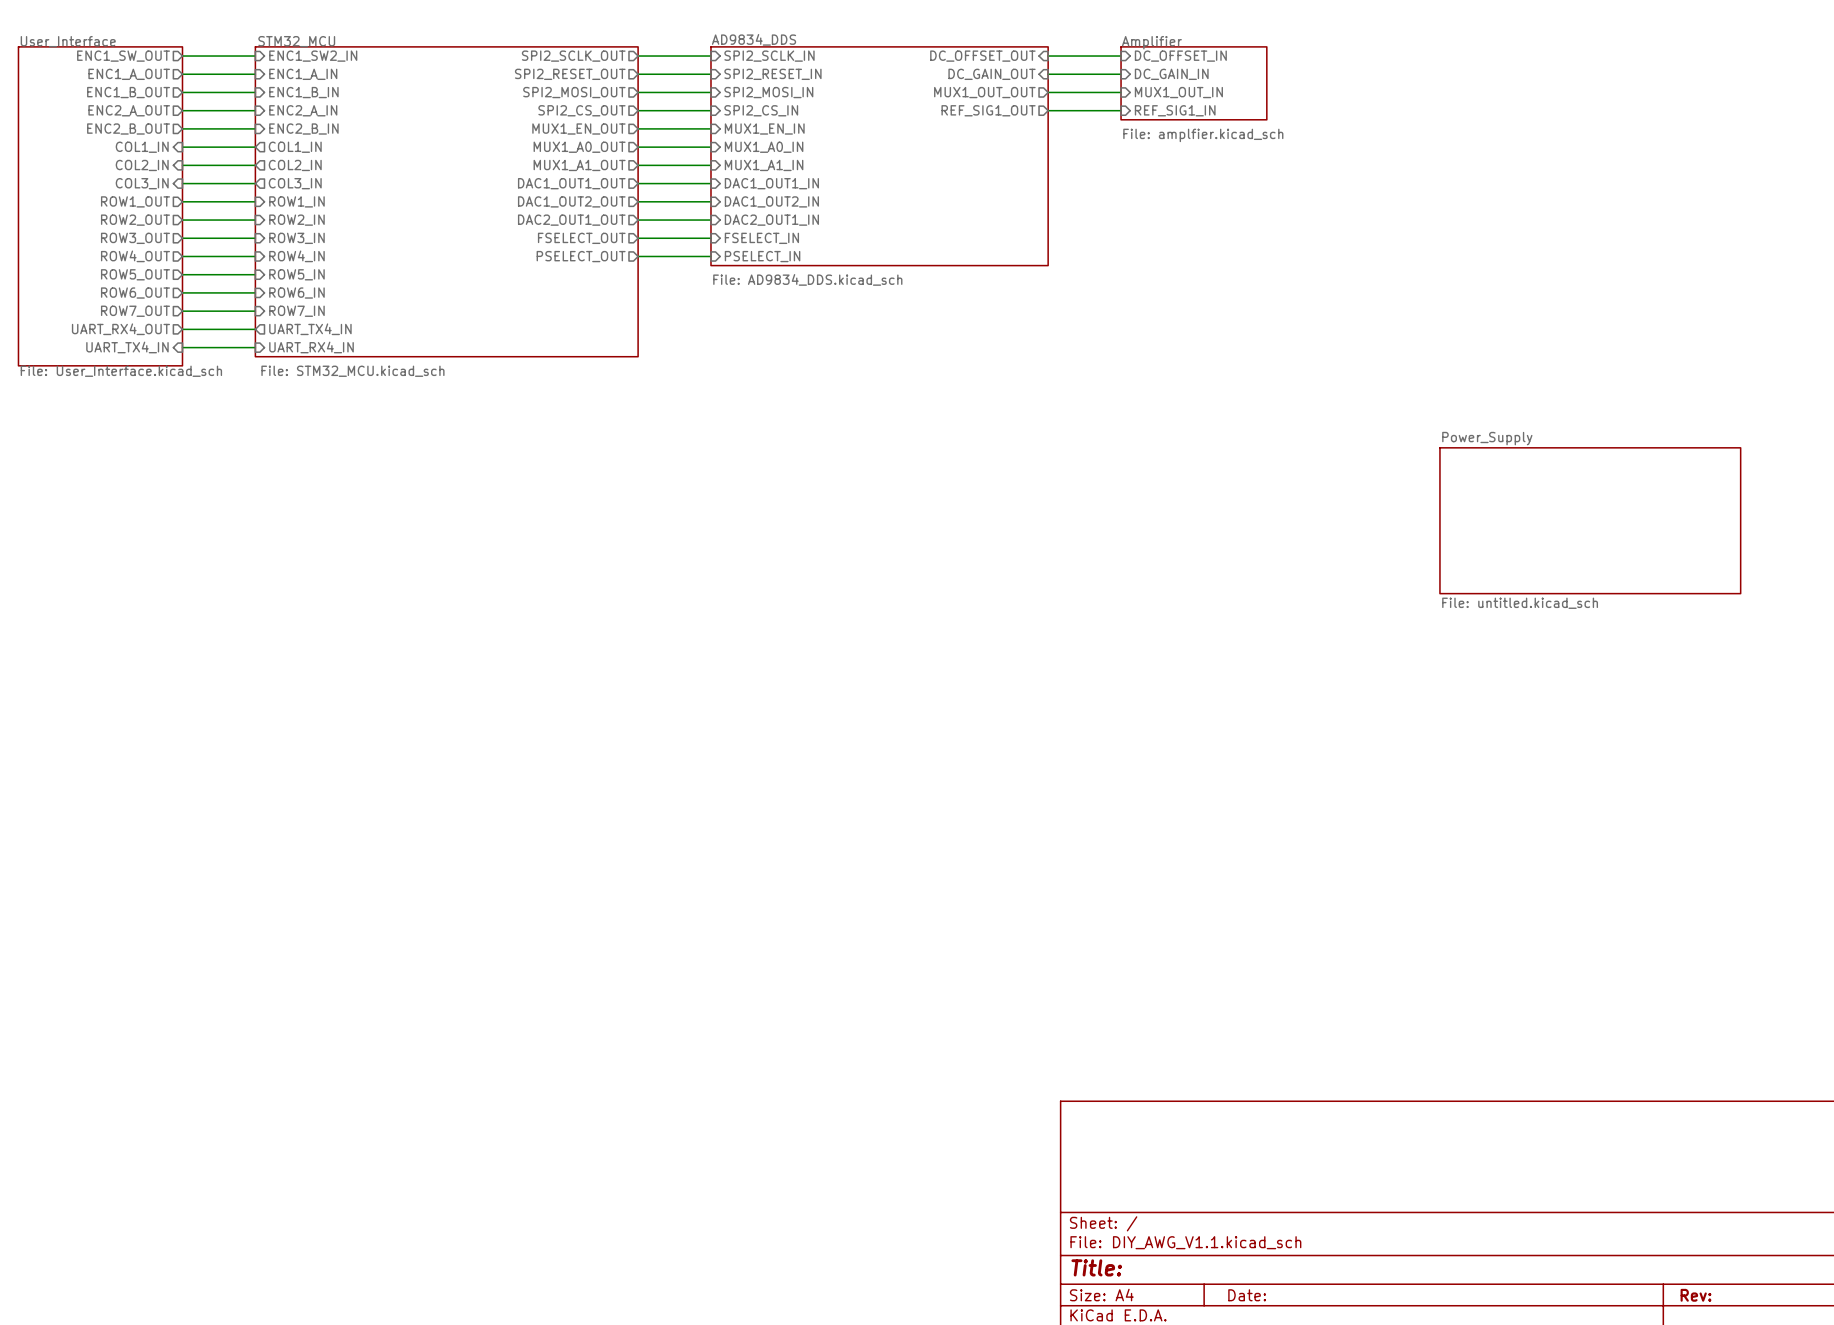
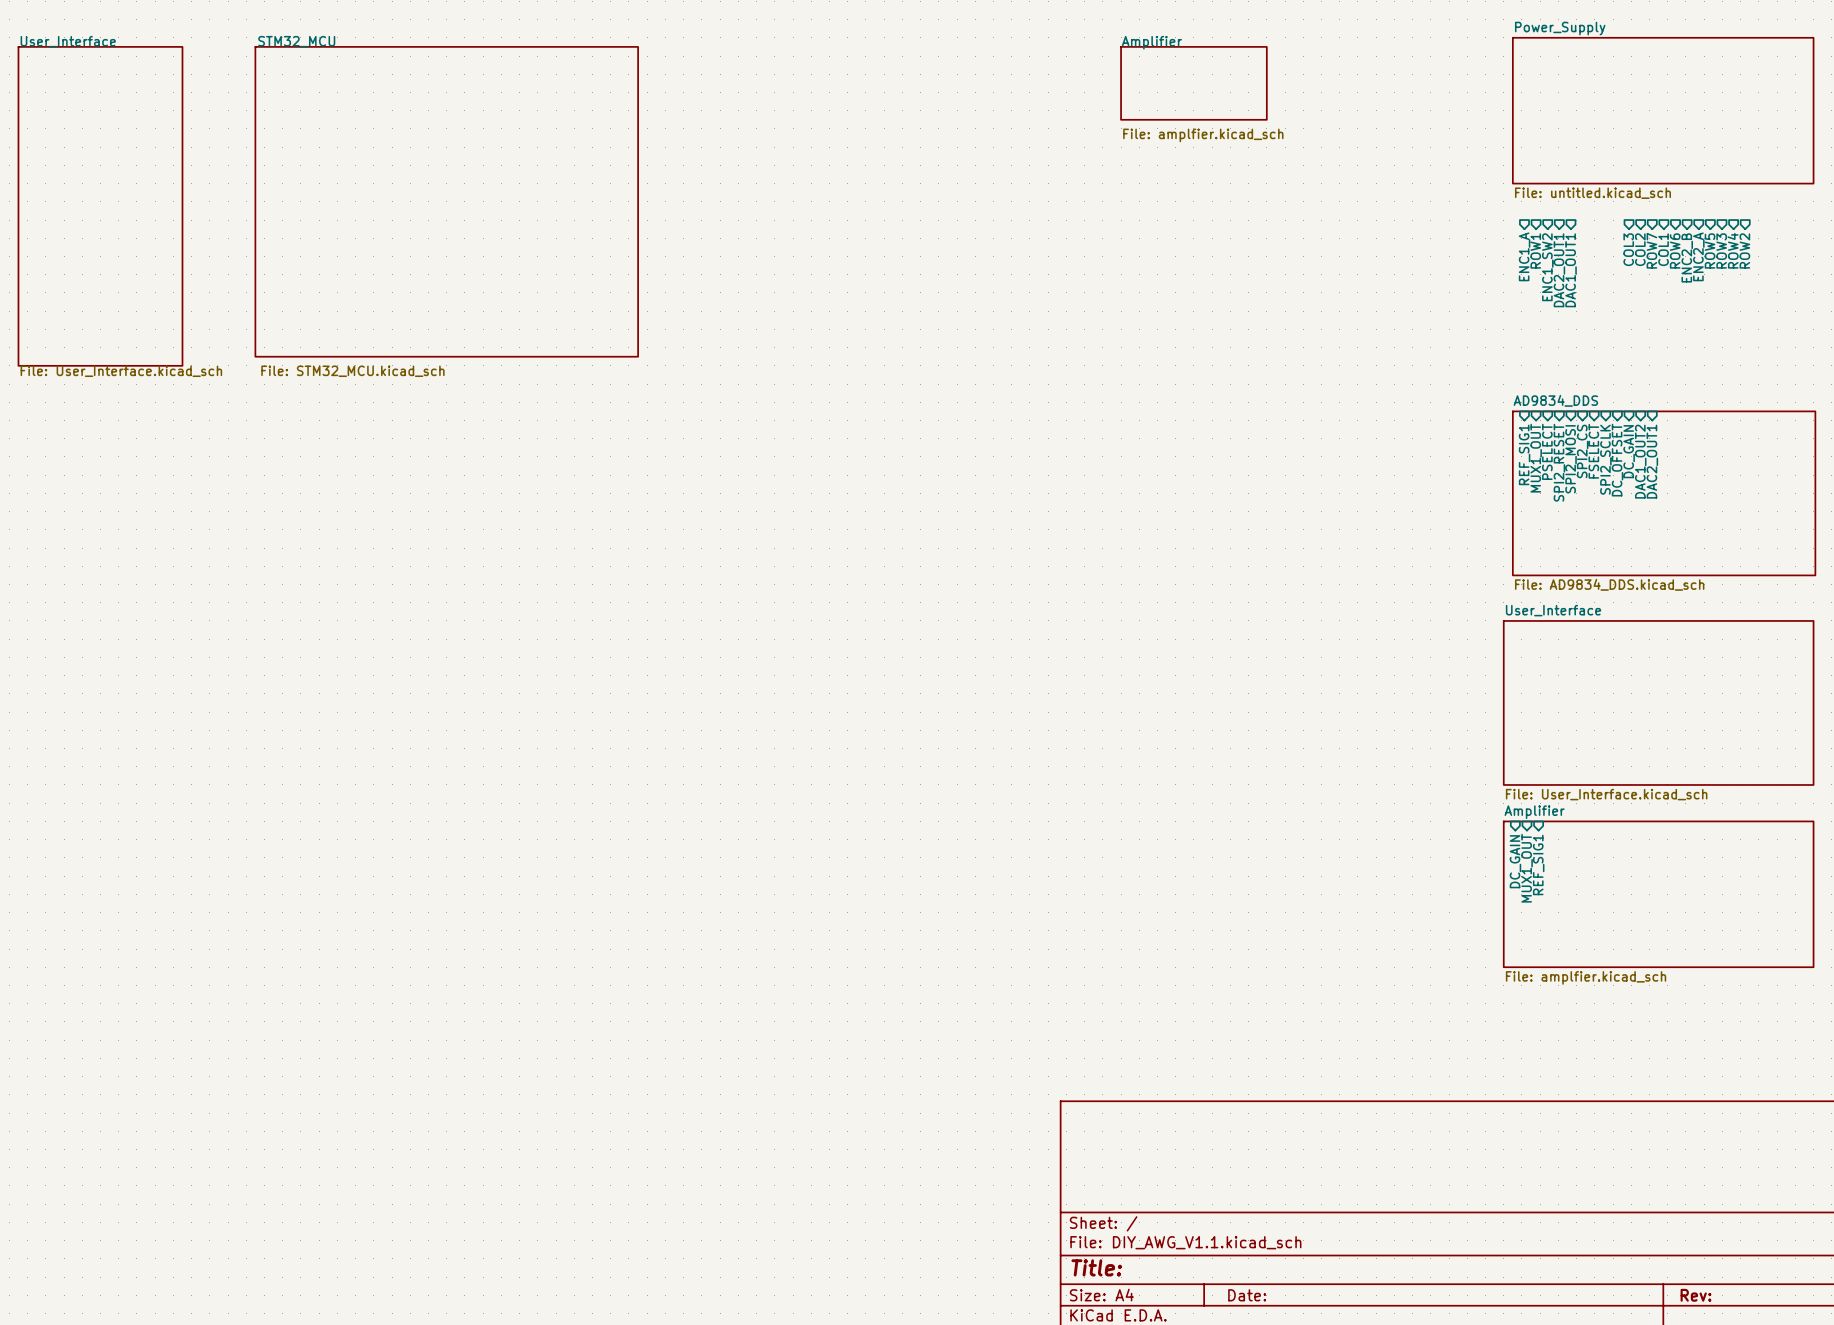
sheet AD9834_DDS name position: AD9834_DDS (754, 39) -> AD9834_DDS (1555, 400)
sheet AD9834_DDS shape: [710, 46, 1049, 267] -> [1512, 410, 1816, 576]
sheet pin: ENC1_SW_OUT (123, 56) -> none
wire: (182, 56) (255, 56) -> none
sheet pin: ENC1_SW2_IN (313, 56) -> none
sheet pin: SPI2_SCLK_OUT (573, 56) -> none
wire: (638, 56) (710, 56) -> none
sheet pin: SPI2_SCLK_IN (769, 56) -> none
sheet pin: DC_OFFSET_OUT (982, 56) -> none
wire: (1048, 56) (1121, 56) -> none
sheet pin: DC_OFFSET_IN (1180, 56) -> none
sheet pin: ENC1_A_OUT (129, 74) -> none
wire: (182, 74) (255, 74) -> none
sheet pin: ENC1_A_IN (303, 74) -> none
sheet pin: SPI2_RESET_OUT (570, 74) -> none
wire: (638, 74) (710, 74) -> none
sheet pin: SPI2_RESET_IN (772, 74) -> none
sheet pin: DC_GAIN_OUT (992, 74) -> none
wire: (1048, 74) (1121, 74) -> none
sheet pin: DC_GAIN_IN (1171, 74) -> none
sheet pin: ENC1_B_OUT (128, 92) -> none
wire: (182, 92) (255, 92) -> none
sheet pin: ENC1_B_IN (303, 92) -> none
sheet pin: SPI2_MOSI_OUT (574, 92) -> none
wire: (638, 92) (710, 92) -> none
sheet pin: SPI2_MOSI_IN (768, 92) -> none
sheet pin: MUX1_OUT_OUT (984, 92) -> none
wire: (1048, 92) (1121, 92) -> none
sheet pin: MUX1_OUT_IN (1178, 92) -> none
sheet pin: ENC2_A_OUT (129, 110) -> none
wire: (182, 110) (255, 110) -> none
sheet pin: ENC2_A_IN (303, 110) -> none
sheet pin: SPI2_CS_OUT (581, 110) -> none
wire: (638, 110) (710, 110) -> none
sheet pin: SPI2_CS_IN (761, 110) -> none
sheet pin: REF_SIG1_OUT (988, 110) -> none
wire: (1048, 110) (1121, 110) -> none
sheet pin: REF_SIG1_IN (1175, 110) -> none
sheet Power_Supply: none -> File: untitled.kicad_sch (1663, 110)
wire: (182, 128) (255, 128) -> none
wire: (638, 128) (710, 128) -> none
sheet pin: ENC2_B_OUT (128, 129) -> none
sheet pin: ENC2_B_IN (303, 129) -> none
sheet pin: MUX1_EN_OUT (578, 129) -> none
sheet pin: MUX1_EN_IN (764, 129) -> none
sheet pin: COL1_IN (142, 147) -> none
wire: (182, 147) (255, 147) -> none
sheet pin: COL1_IN (295, 147) -> none
sheet pin: MUX1_A0_OUT (579, 147) -> none
wire: (638, 147) (710, 147) -> none
sheet pin: MUX1_A0_IN (764, 147) -> none
sheet pin: COL2_IN (142, 165) -> none
wire: (182, 165) (255, 165) -> none
sheet pin: COL2_IN (295, 165) -> none
sheet pin: MUX1_A1_OUT (579, 165) -> none
wire: (638, 165) (710, 165) -> none
sheet pin: MUX1_A1_IN (764, 165) -> none
sheet pin: COL3_IN (142, 183) -> none
wire: (182, 183) (255, 183) -> none
sheet pin: COL3_IN (295, 183) -> none
sheet pin: DAC1_OUT1_OUT (571, 183) -> none
wire: (638, 183) (710, 183) -> none
sheet pin: DAC1_OUT1_IN (771, 183) -> none
sheet pin: ROW1_OUT (135, 201) -> none
wire: (182, 201) (255, 201) -> none
sheet pin: ROW1_IN (296, 201) -> none
sheet pin: DAC1_OUT2_OUT (571, 201) -> none
wire: (638, 201) (710, 201) -> none
sheet pin: DAC1_OUT2_IN (771, 201) -> none
sheet pin: ROW2_OUT (135, 220) -> none
wire: (182, 220) (255, 220) -> none
sheet pin: ROW2_IN (296, 220) -> none
sheet pin: DAC2_OUT1_OUT (571, 220) -> none
wire: (638, 220) (710, 220) -> none
sheet pin: DAC2_OUT1_IN (771, 220) -> none
sheet pin: ROW3_OUT (135, 238) -> none
wire: (182, 238) (255, 238) -> none
sheet pin: ROW3_IN (296, 238) -> none
sheet pin: FSELECT_OUT (581, 238) -> none
wire: (638, 238) (710, 238) -> none
sheet pin: FSELECT_IN (761, 238) -> none
sheet pin: none -> COL3 (1628, 249)
sheet pin: none -> COL2 (1640, 249)
sheet pin: none -> COL1 (1663, 249)
sheet pin: none -> ROW1 (1535, 250)
sheet pin: none -> ROW7 (1651, 250)
sheet pin: none -> ROW6 (1675, 250)
sheet pin: none -> ROW5 (1710, 250)
sheet pin: none -> ROW3 (1721, 250)
sheet pin: none -> ROW4 (1733, 250)
sheet pin: none -> ROW2 (1744, 250)
sheet pin: ROW4_OUT (135, 256) -> none
wire: (182, 256) (255, 256) -> none
sheet pin: ROW4_IN (296, 256) -> none
sheet pin: PSELECT_OUT (581, 256) -> none
wire: (638, 256) (710, 256) -> none
sheet pin: PSELECT_IN (762, 256) -> none
sheet pin: none -> ENC1_A (1524, 256)
sheet pin: none -> ENC2_A (1698, 256)
sheet pin: none -> ENC2_B (1687, 257)
sheet pin: none -> ENC1_SW2 (1547, 267)
sheet pin: none -> DAC2_OUT1 (1559, 270)
sheet pin: none -> DAC1_OUT1 (1571, 270)
sheet pin: ROW5_OUT (135, 274) -> none
wire: (182, 274) (255, 274) -> none
sheet pin: ROW5_IN (296, 274) -> none
sheet AD9834_DDS value position: File: AD9834_DDS.kicad_sch (807, 279) -> File: AD9834_DDS.kicad_sch (1609, 584)
wire: (182, 292) (255, 292) -> none
sheet pin: ROW6_OUT (135, 293) -> none
sheet pin: ROW6_IN (296, 293) -> none
sheet pin: ROW7_OUT (135, 311) -> none
wire: (182, 311) (255, 311) -> none
sheet pin: ROW7_IN (296, 311) -> none
sheet pin: UART_RX4_OUT (120, 329) -> none
wire: (182, 329) (255, 329) -> none
sheet pin: UART_TX4_IN (310, 329) -> none
sheet pin: UART_TX4_IN (127, 347) -> none
wire: (182, 347) (255, 347) -> none
sheet pin: UART_RX4_IN (311, 347) -> none
sheet pin: none -> PSELECT (1547, 451)
sheet pin: none -> SPI2_CS (1582, 451)
sheet pin: none -> FSELECT (1593, 451)
sheet pin: none -> DC_GAIN (1629, 451)
sheet pin: none -> REF_SIG1 (1524, 454)
sheet pin: none -> MUX1_OUT (1536, 458)
sheet pin: none -> SPI2_MOSI (1571, 459)
sheet pin: none -> SPI2_SCLK (1605, 459)
sheet pin: none -> DC_OFFSET (1617, 460)
sheet pin: none -> DAC1_OUT2 (1640, 461)
sheet pin: none -> DAC2_OUT1 (1652, 461)
sheet pin: none -> SPI2_RESET (1559, 462)
sheet Power_Supply: File: untitled.kicad_sch (1590, 520) -> none
sheet User_Interface: none -> File: User_Interface.kicad_sch (1658, 702)
sheet pin: none -> DC_GAIN (1515, 861)
sheet pin: none -> REF_SIG1 (1538, 864)
sheet pin: none -> MUX1_OUT (1527, 868)
sheet Amplifier: none -> File: amplfier.kicad_sch (1658, 894)

